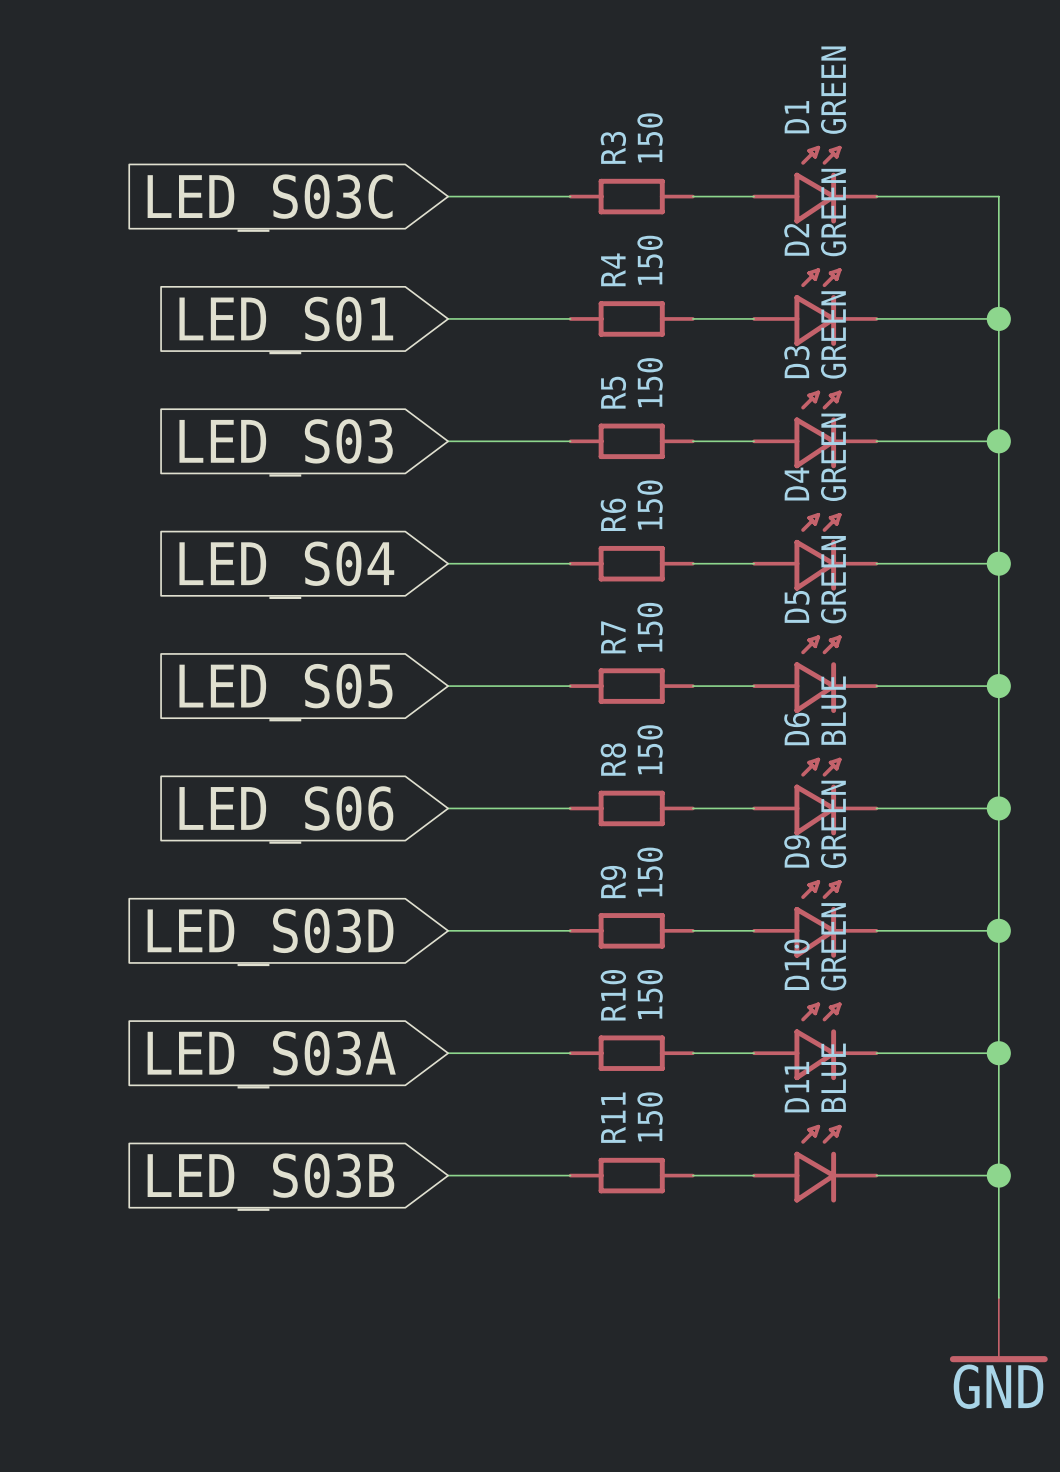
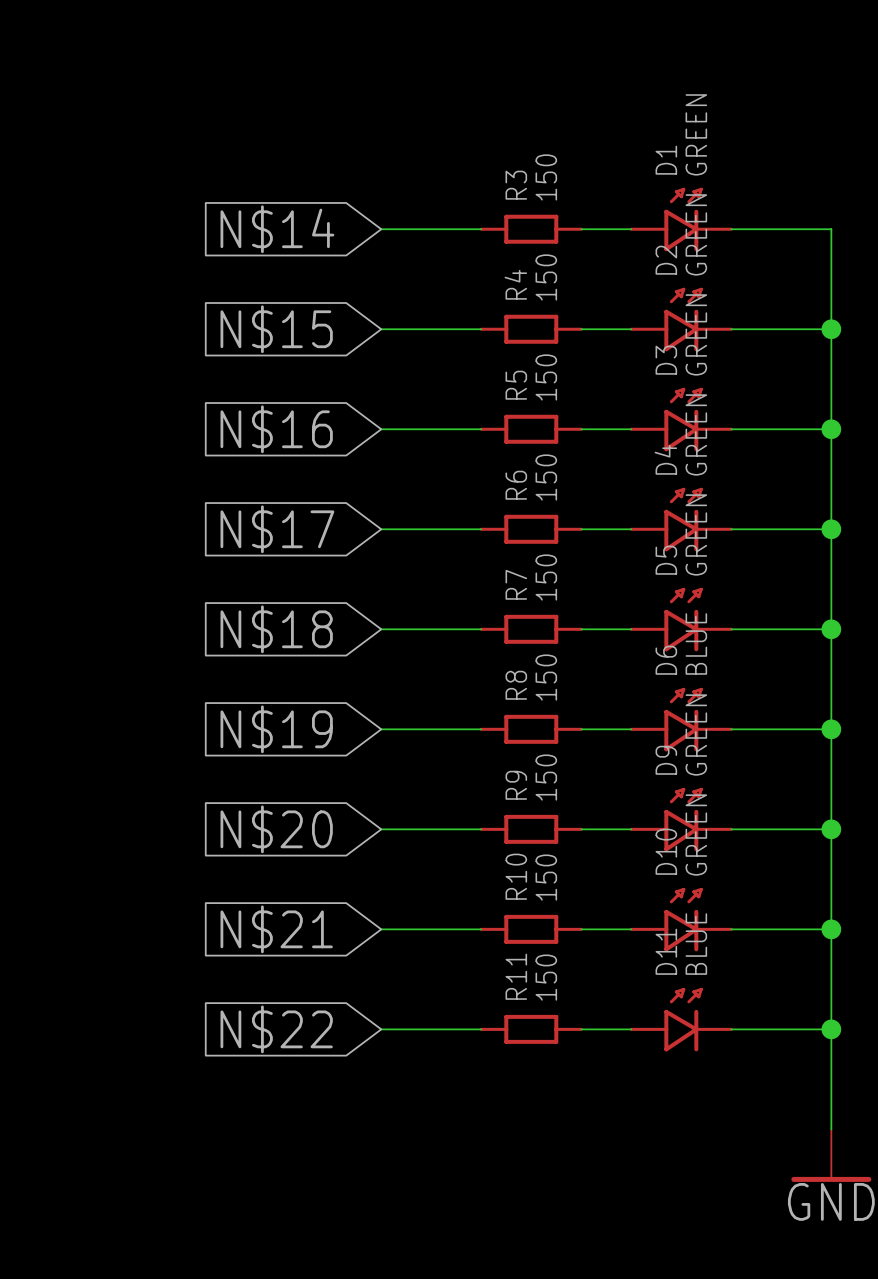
global label: LED_S03C (270, 203) -> N$14 (277, 229)
global label: LED_S01 (286, 325) -> N$15 (276, 329)
global label: LED_S03 (286, 447) -> N$16 (276, 429)
global label: LED_S04 (286, 570) -> N$17 (277, 529)
global label: LED_S05 (285, 692) -> N$18 (276, 629)
global label: LED_S06 (286, 815) -> N$19 (276, 729)
global label: LED_S03D (270, 937) -> N$20 (276, 829)
global label: LED_S03A (271, 1059) -> N$21 (276, 929)
global label: LED_S03B (270, 1182) -> N$22 (276, 1029)

